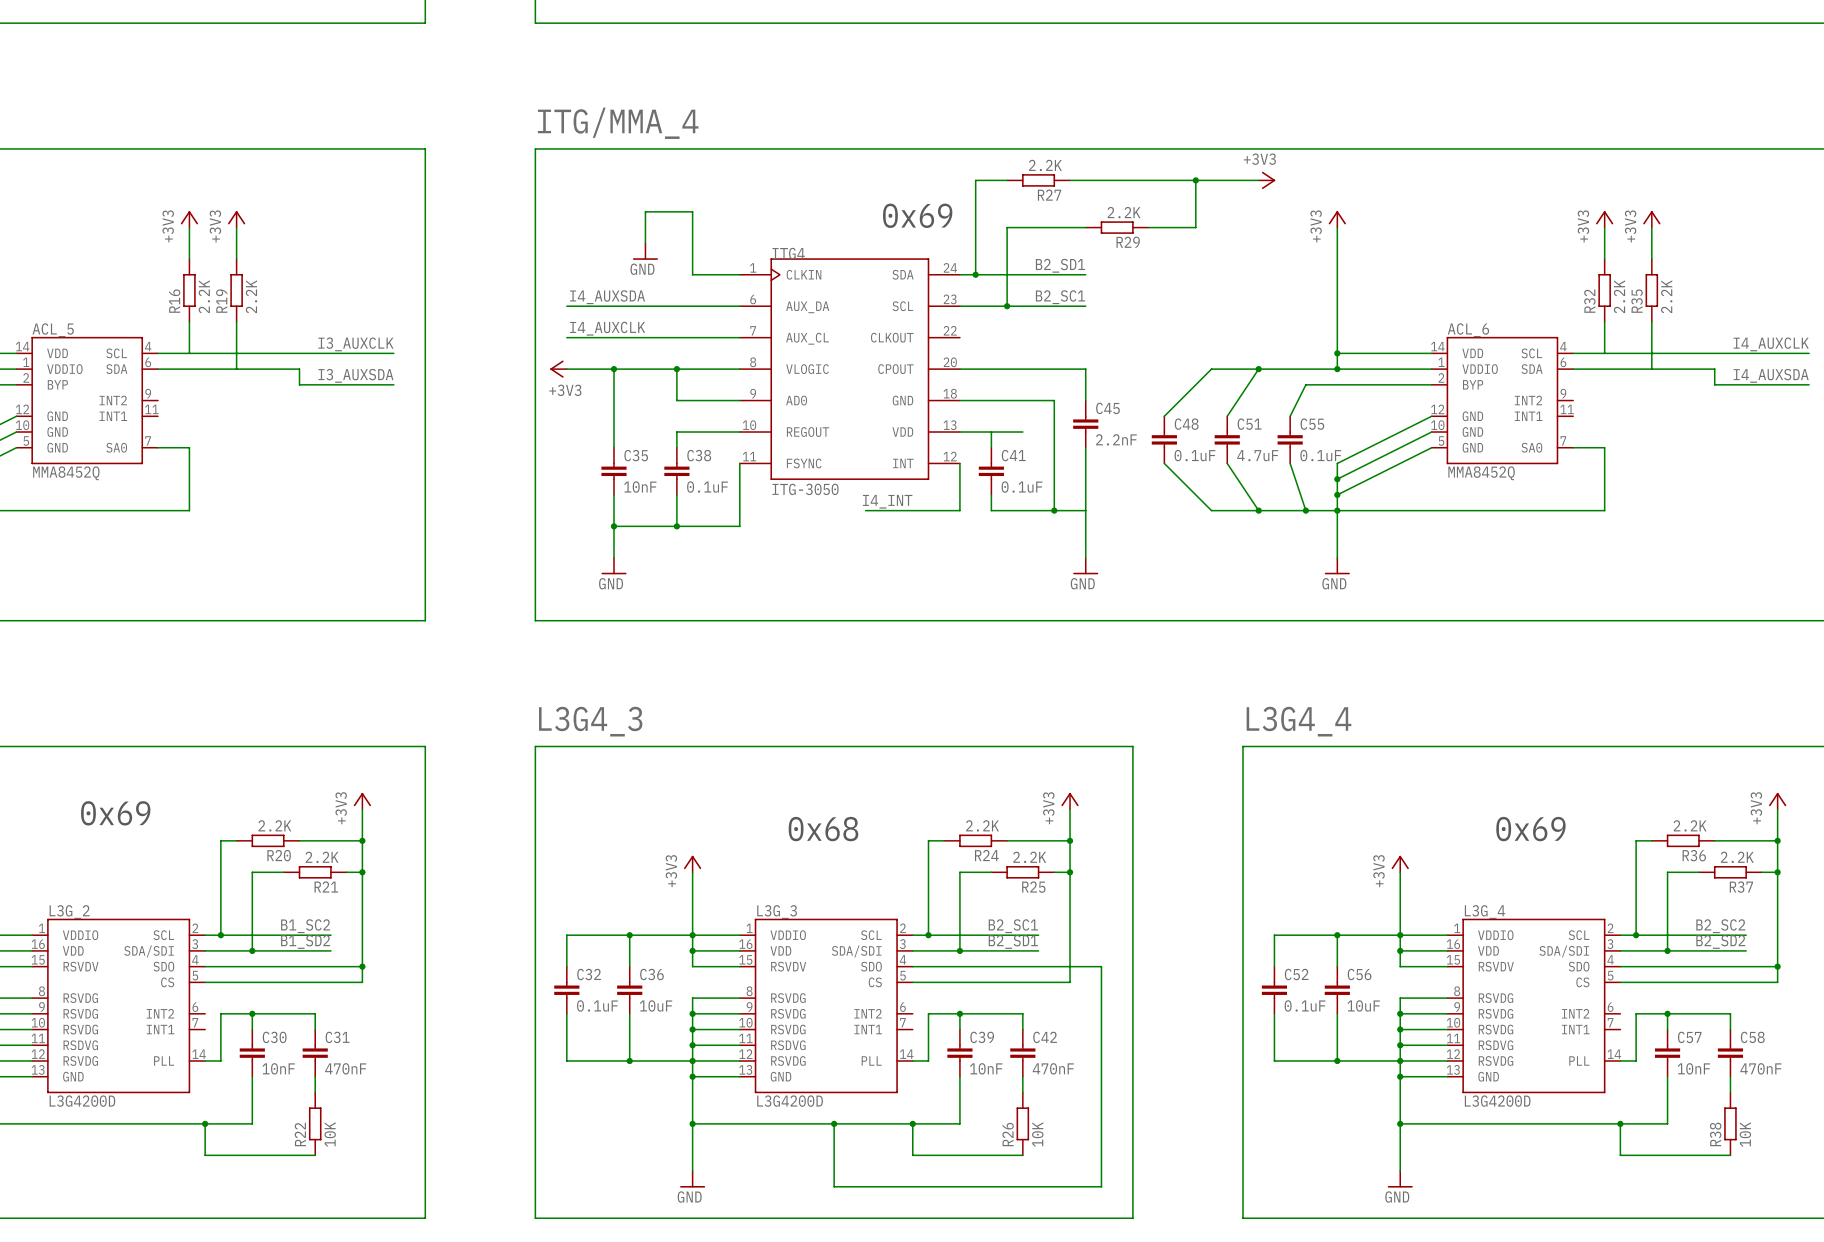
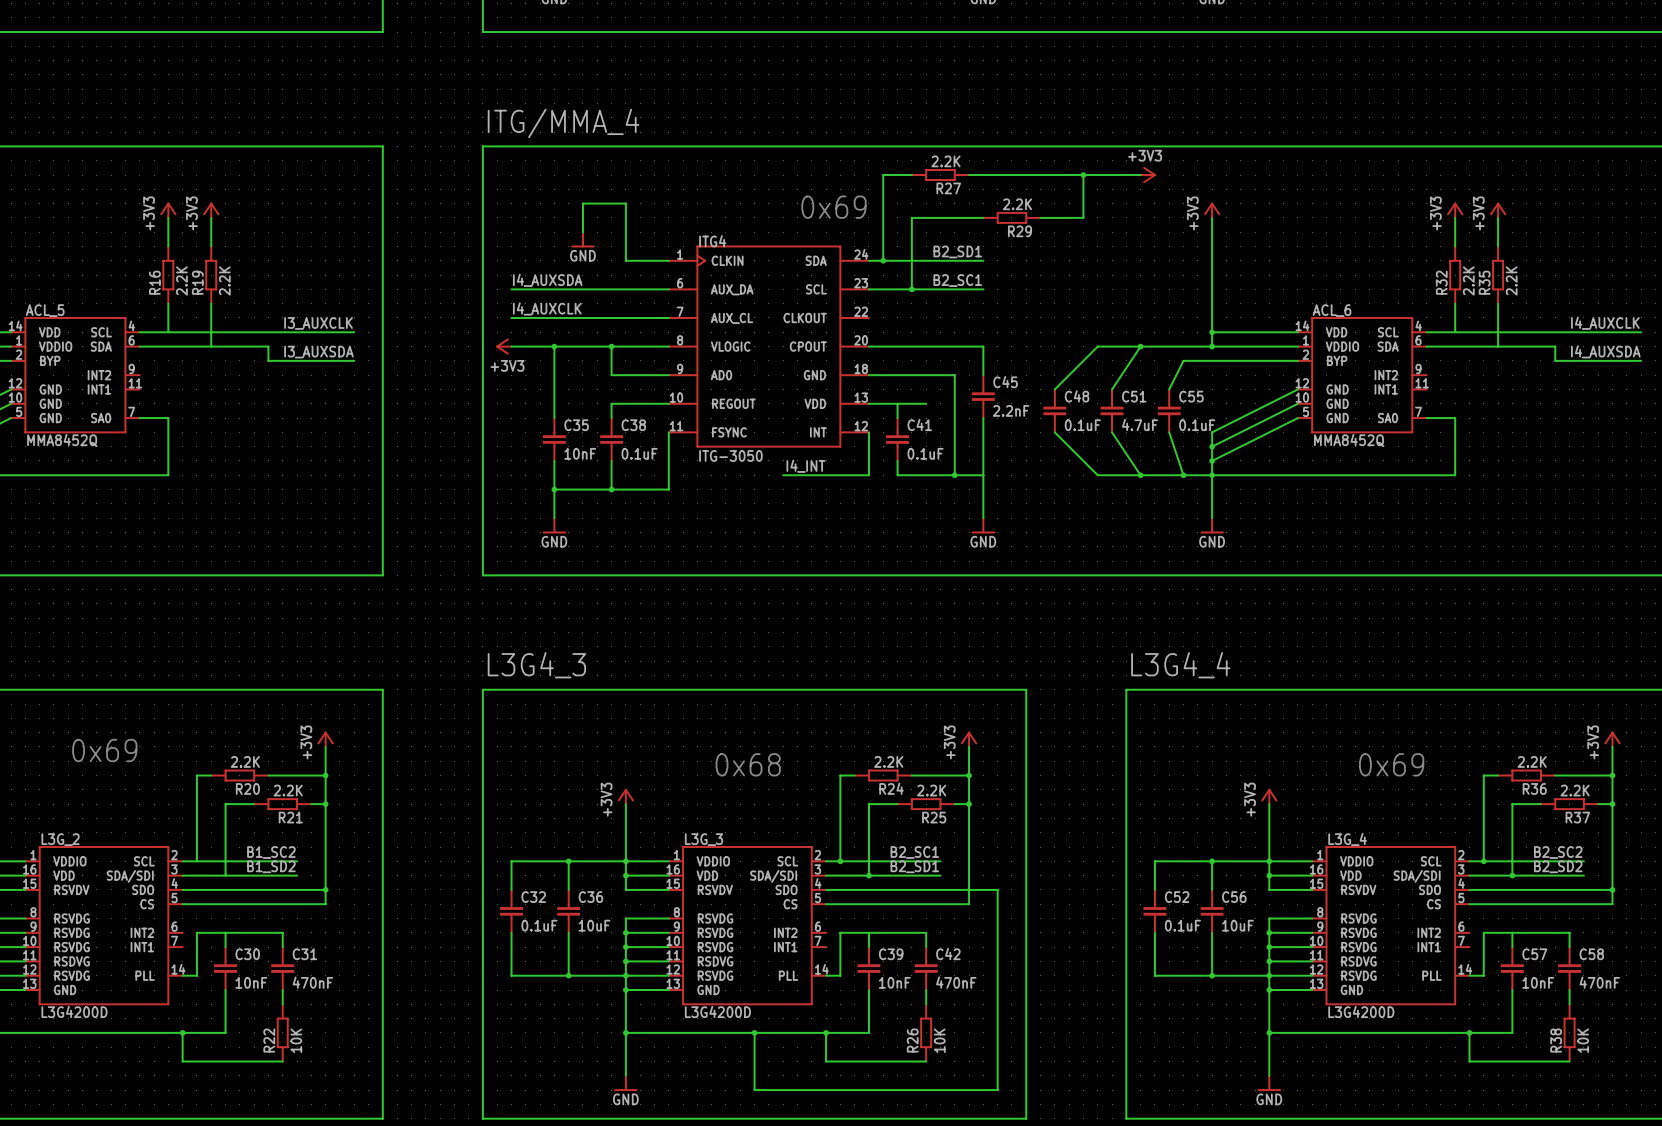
junction: (220, 935) -> none
junction: (252, 950) -> none
junction: (252, 1013) -> none
junction: (959, 1013) -> none
junction: (1667, 1013) -> none

